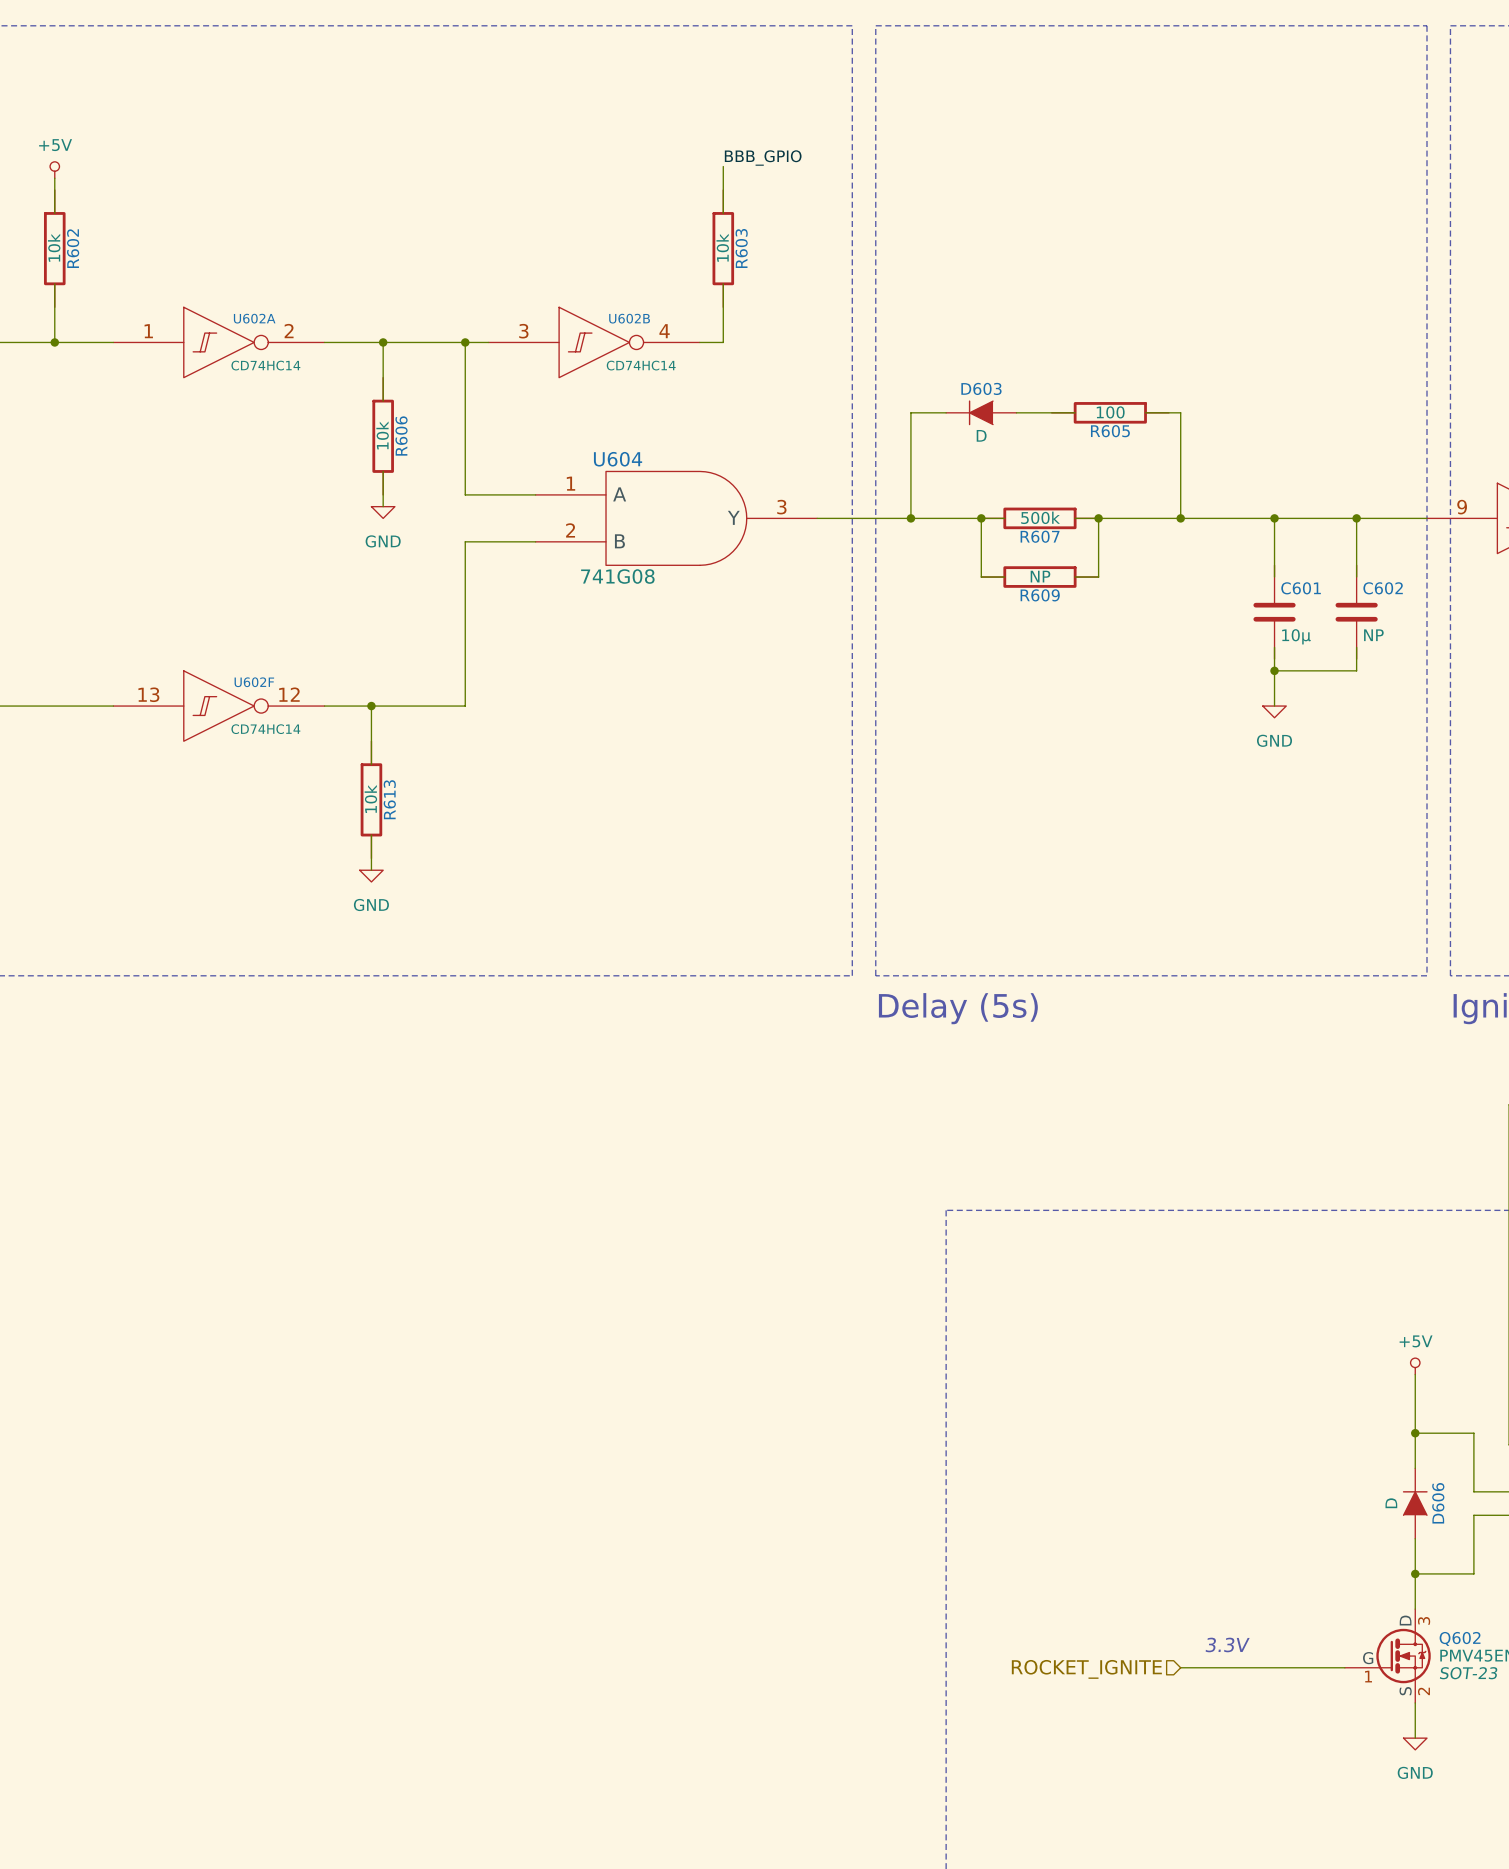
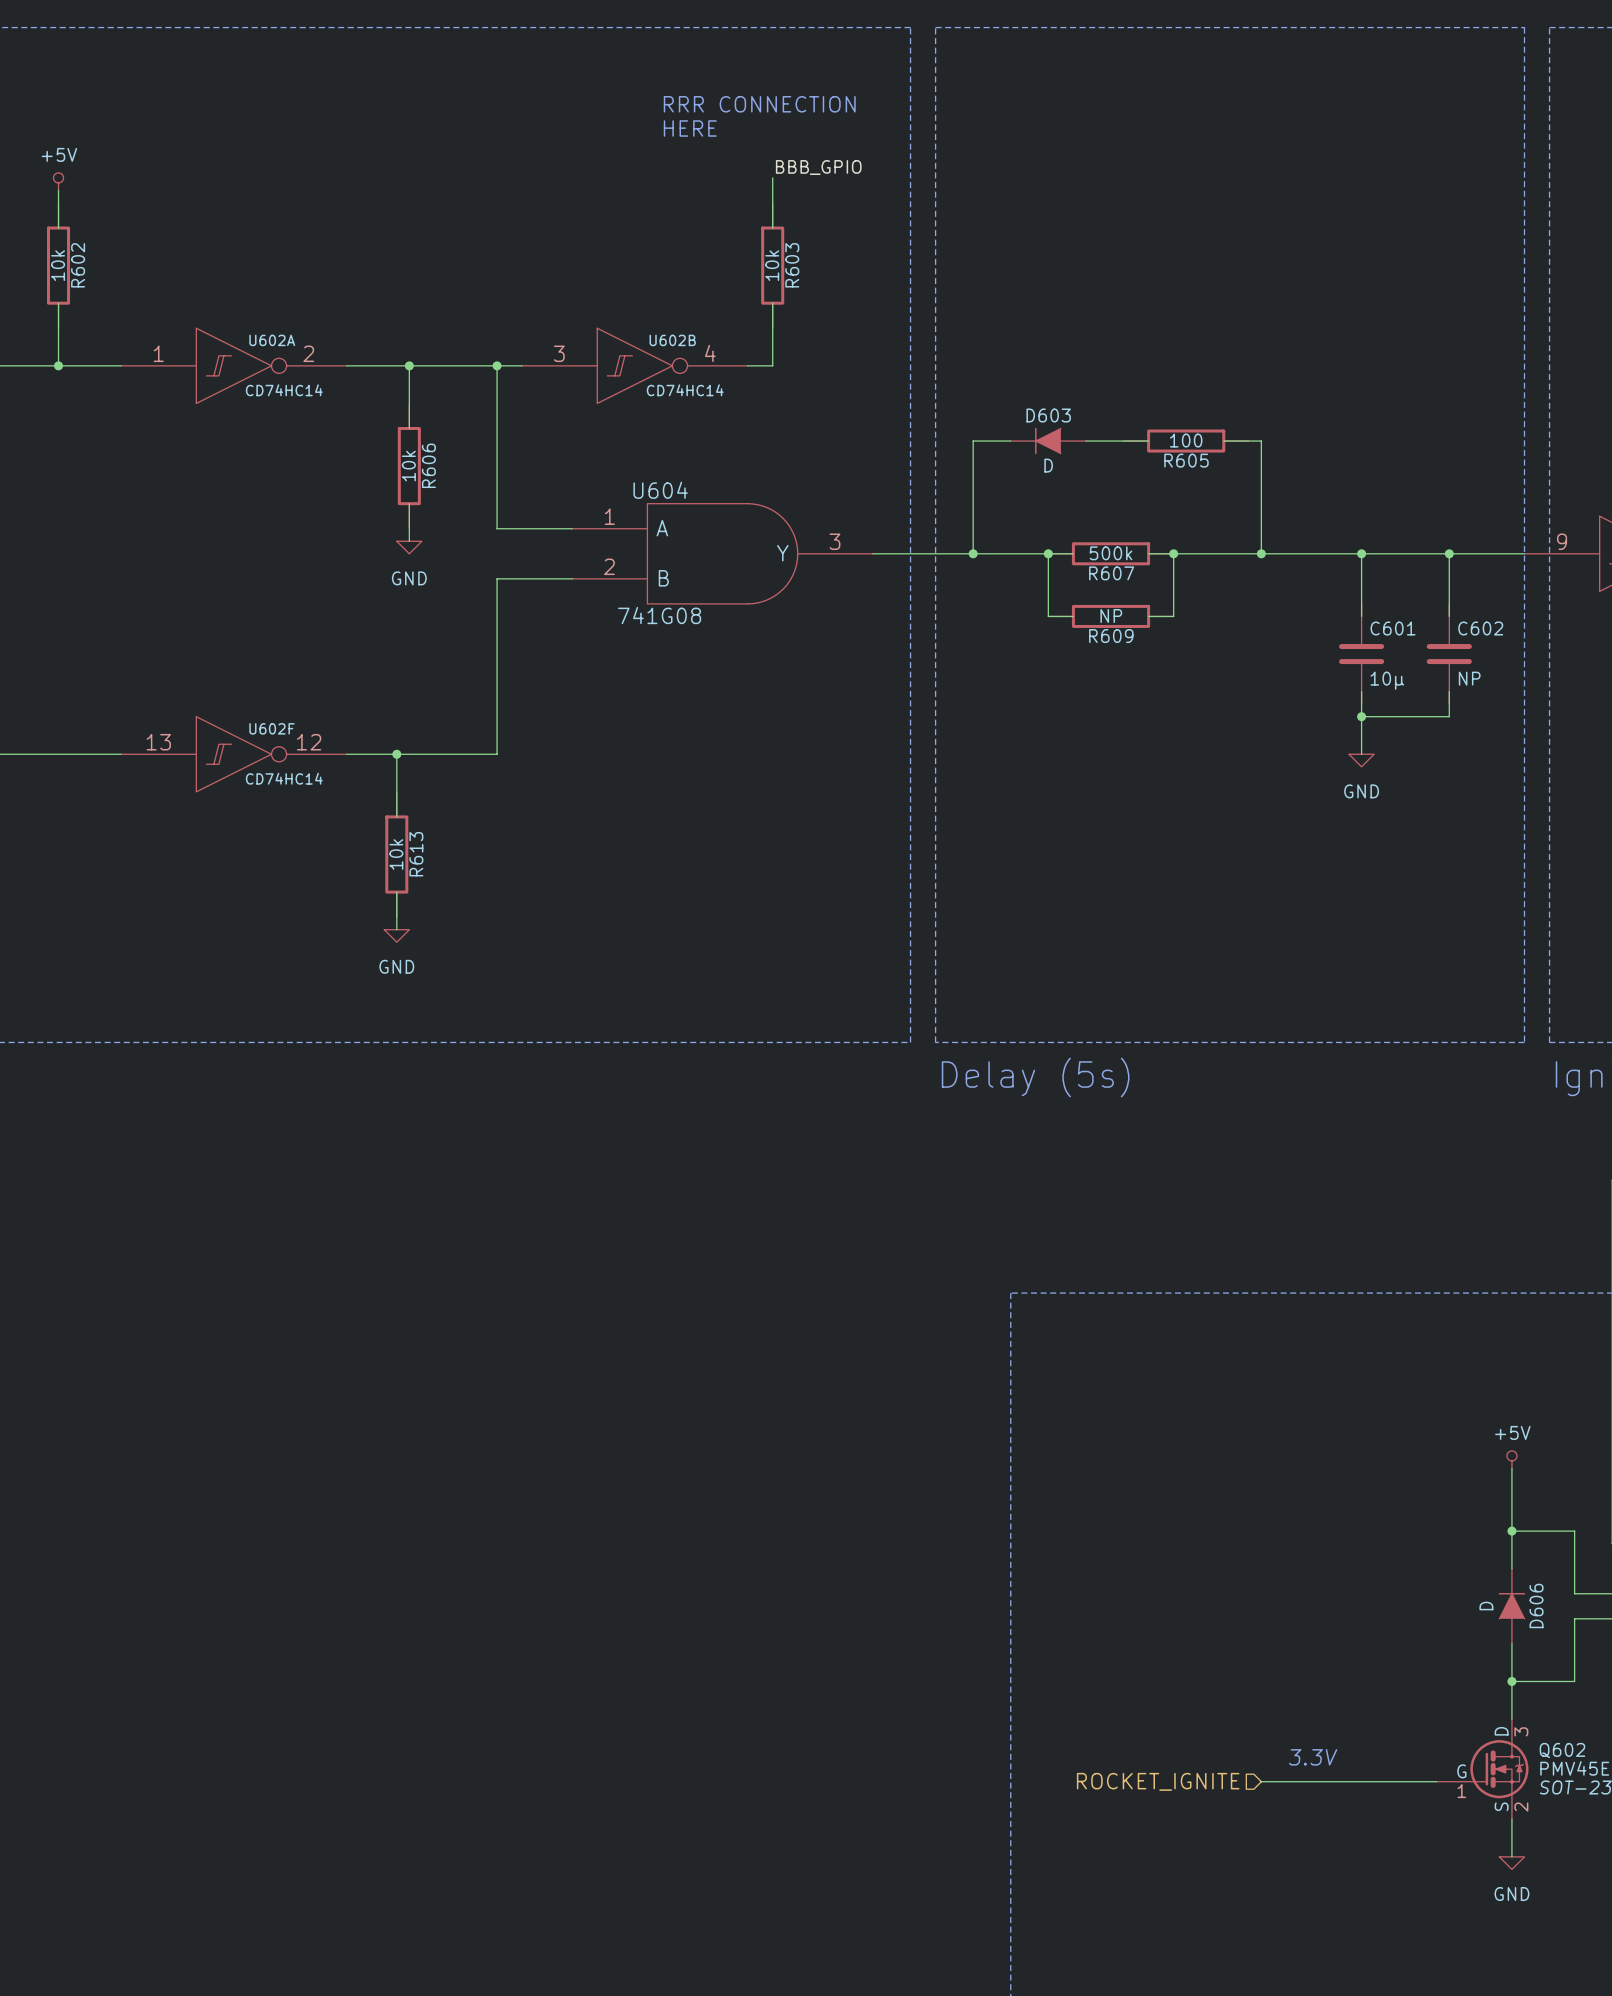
text: none -> RRR CONNECTION (759, 104)
text: none -> HERE (690, 128)

